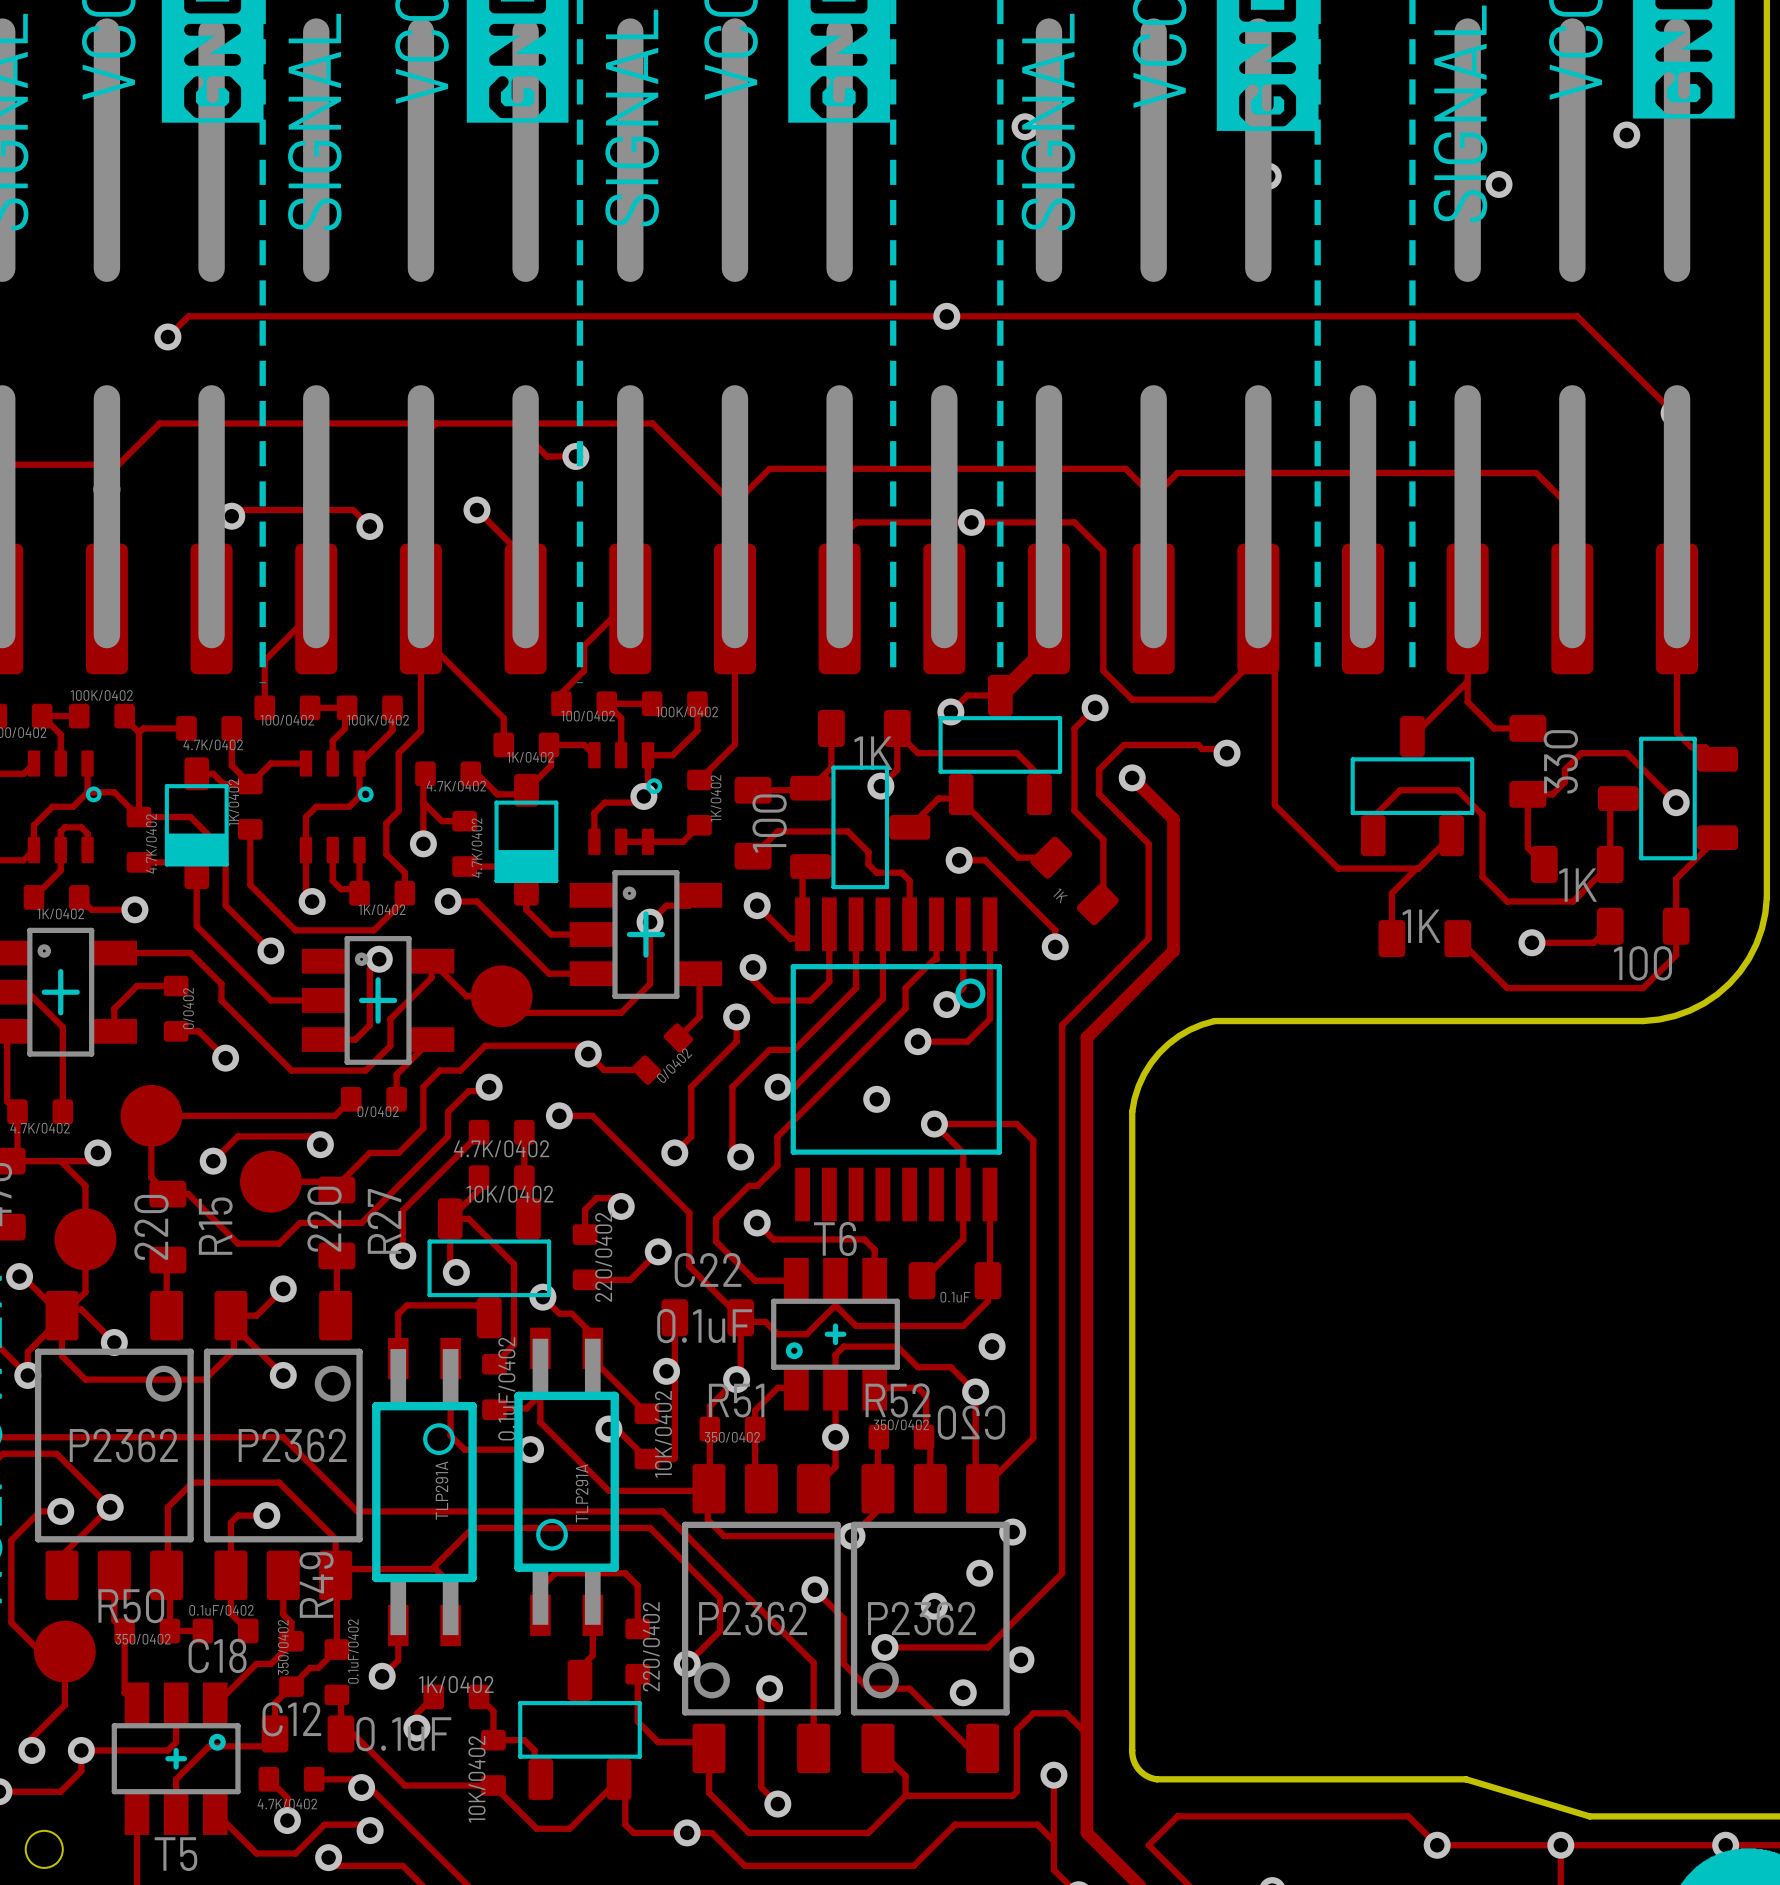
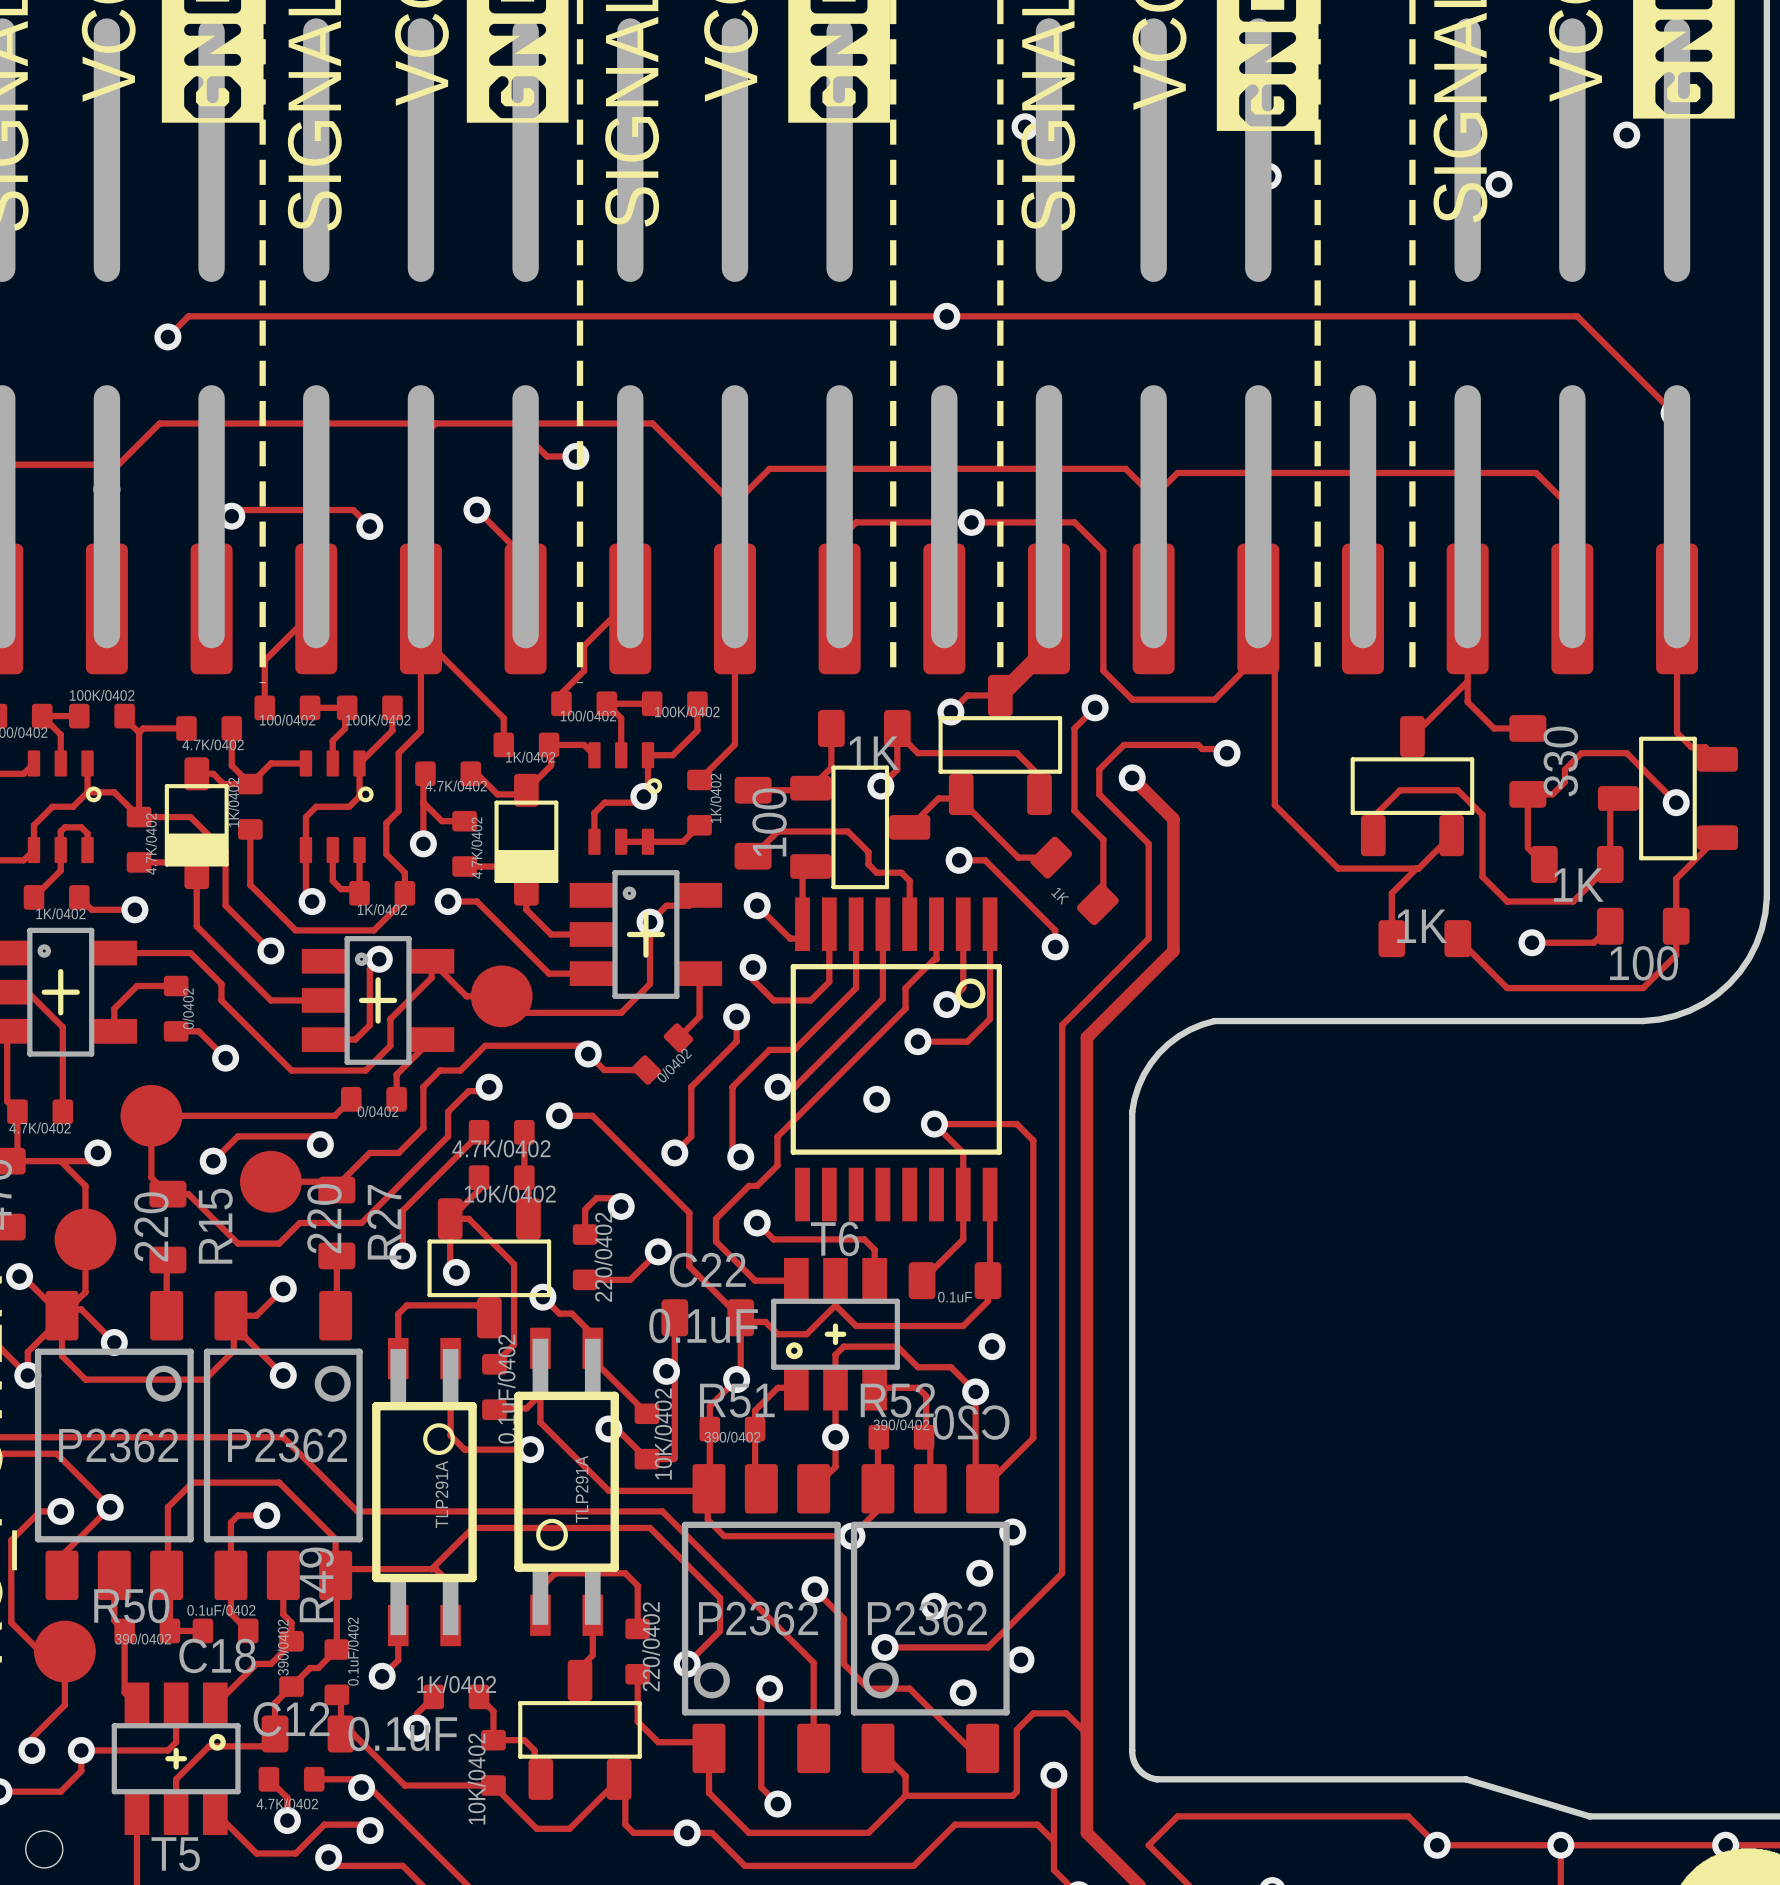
R52 value: 350/0402 (901, 1424) -> 390/0402 (901, 1424)
R51 value: 350/0402 (732, 1437) -> 390/0402 (732, 1437)
R50 value: 350/0402 (143, 1639) -> 390/0402 (143, 1639)
R49 value: 350/0402 (283, 1647) -> 390/0402 (283, 1647)

